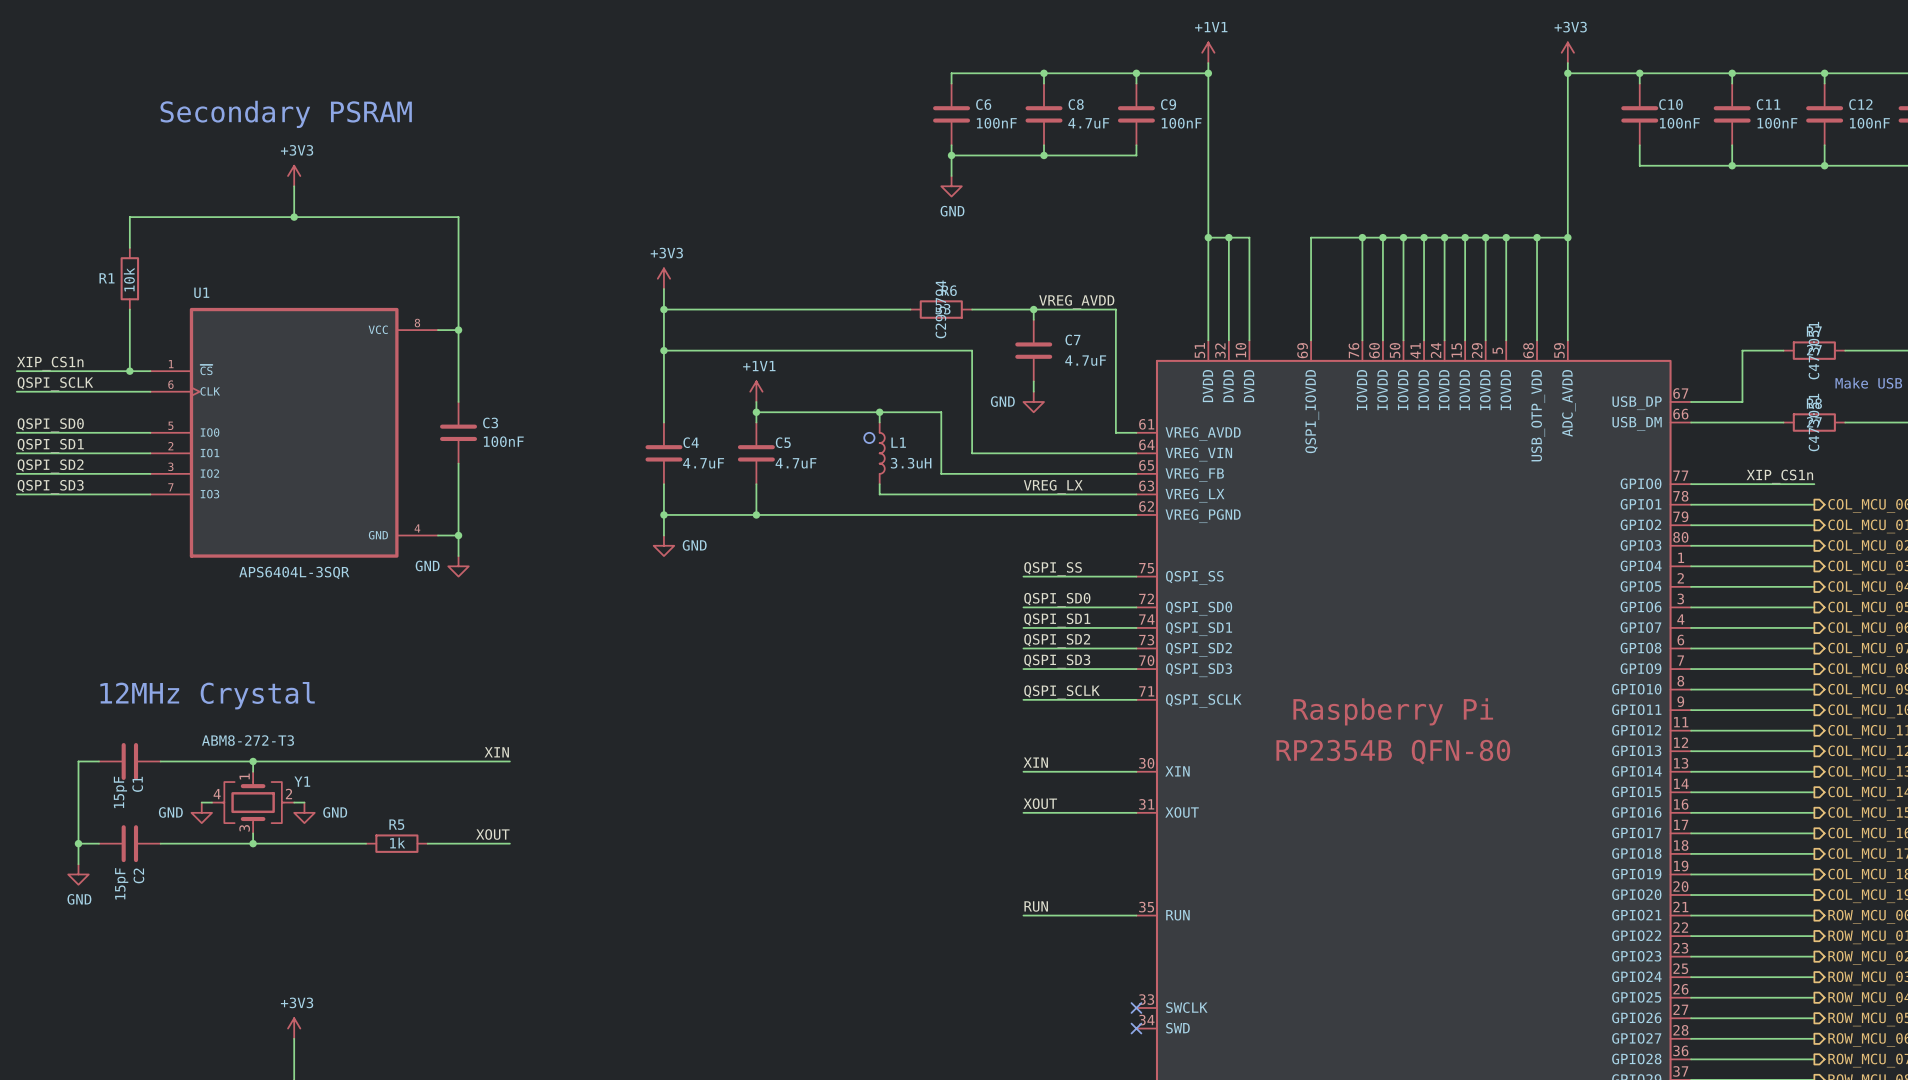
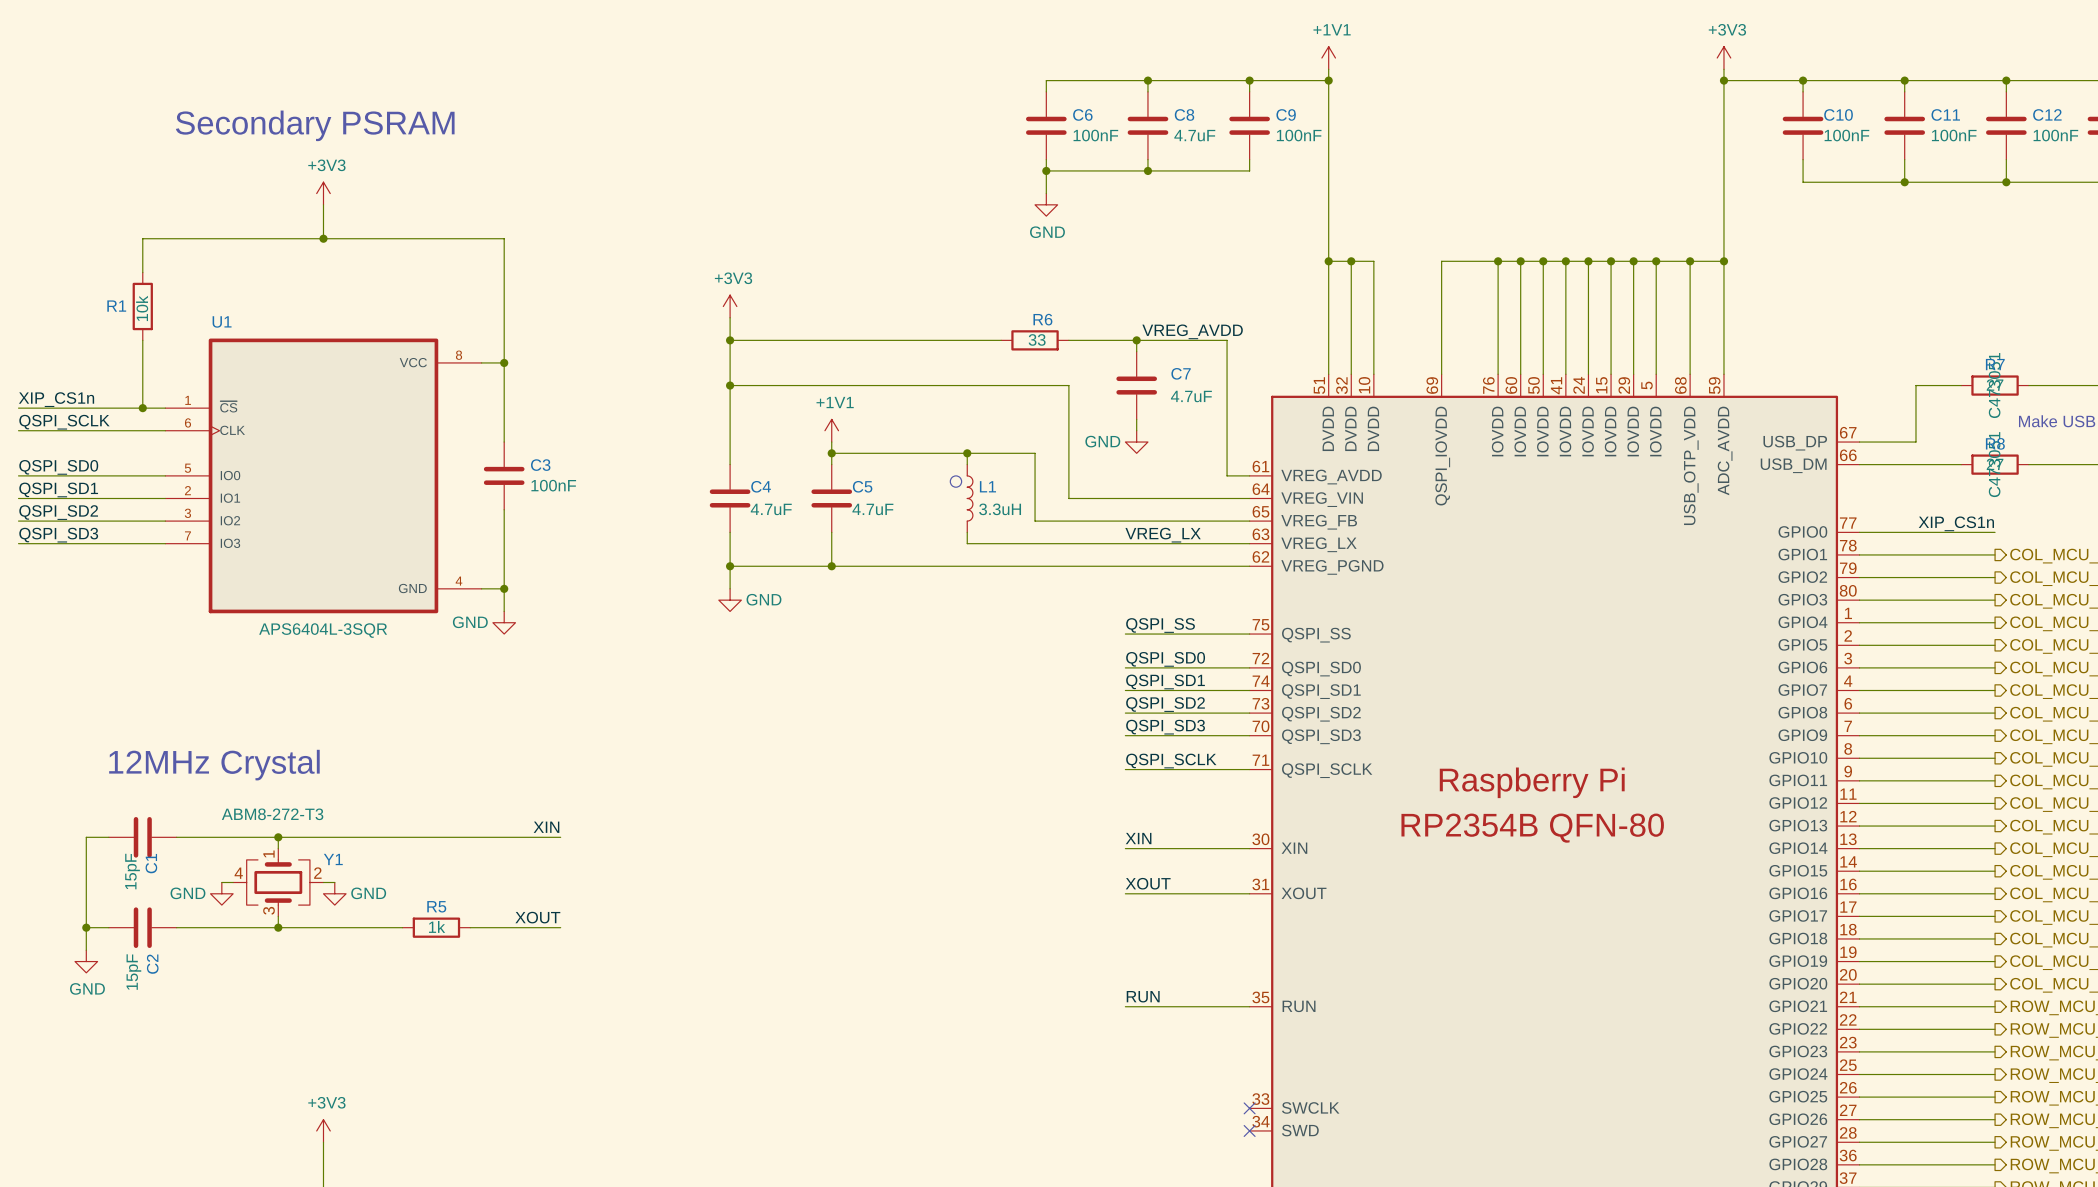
R6 text: C295794 (940, 309) -> none

